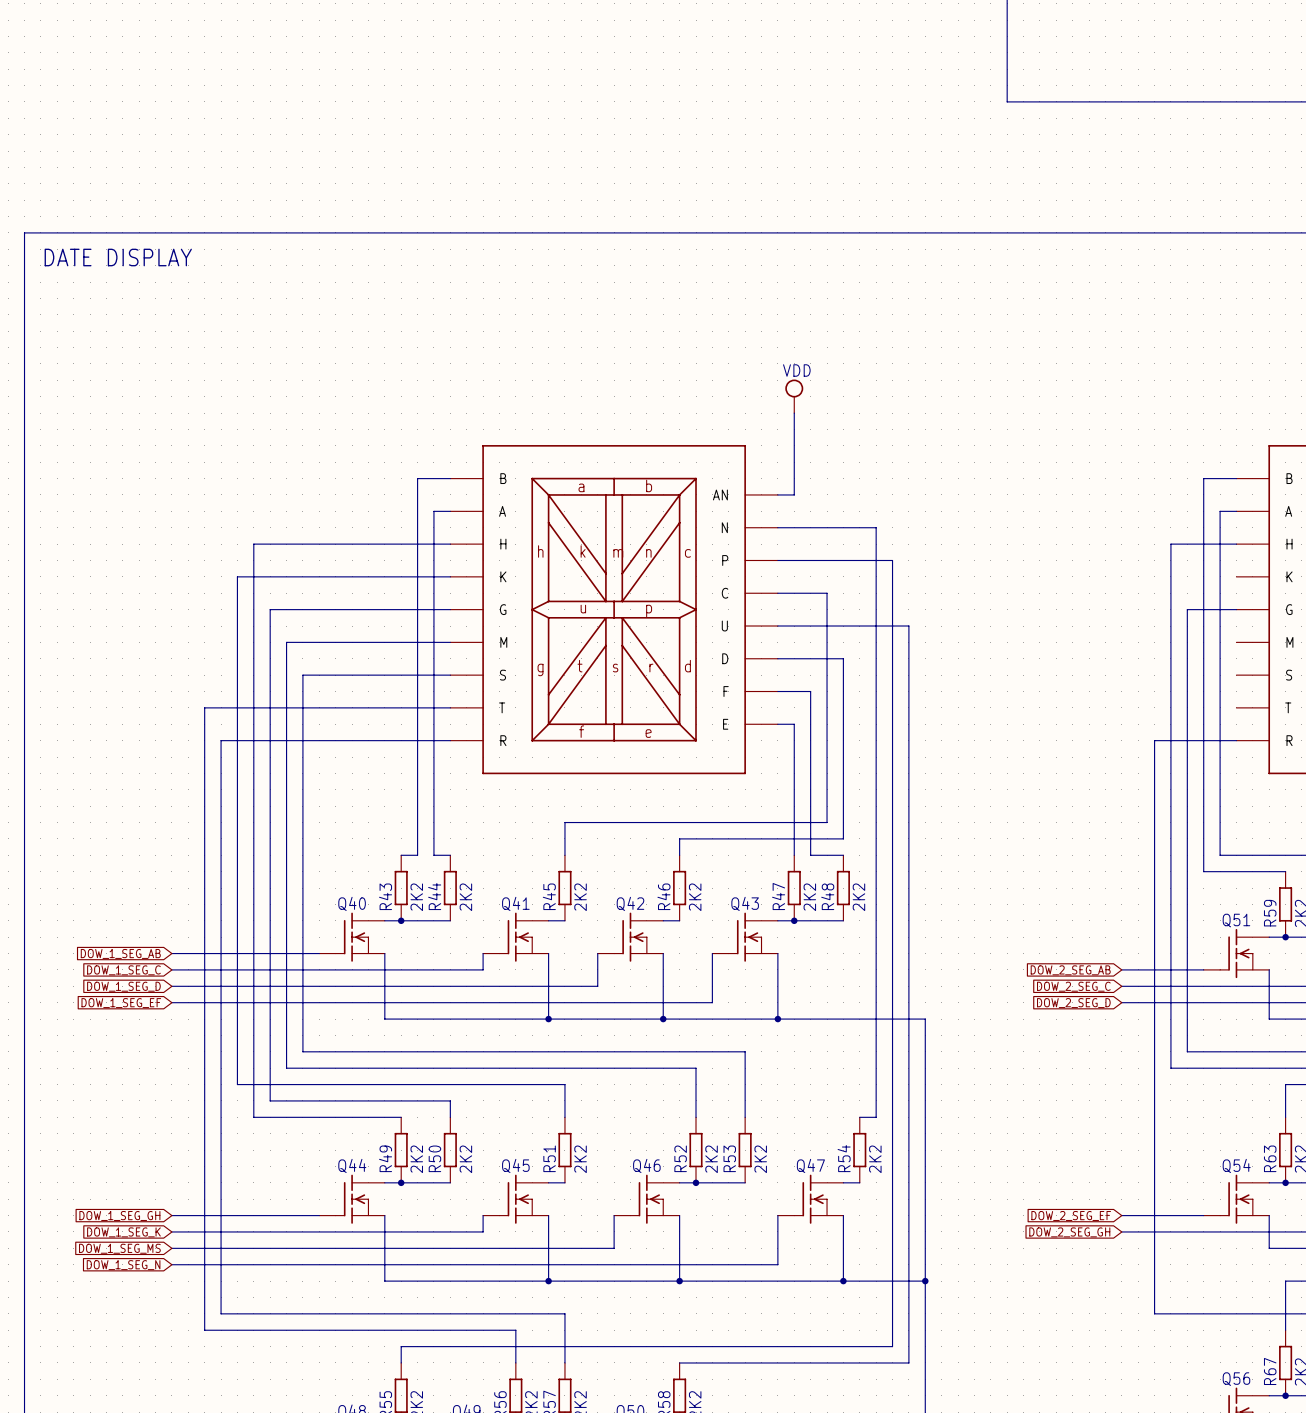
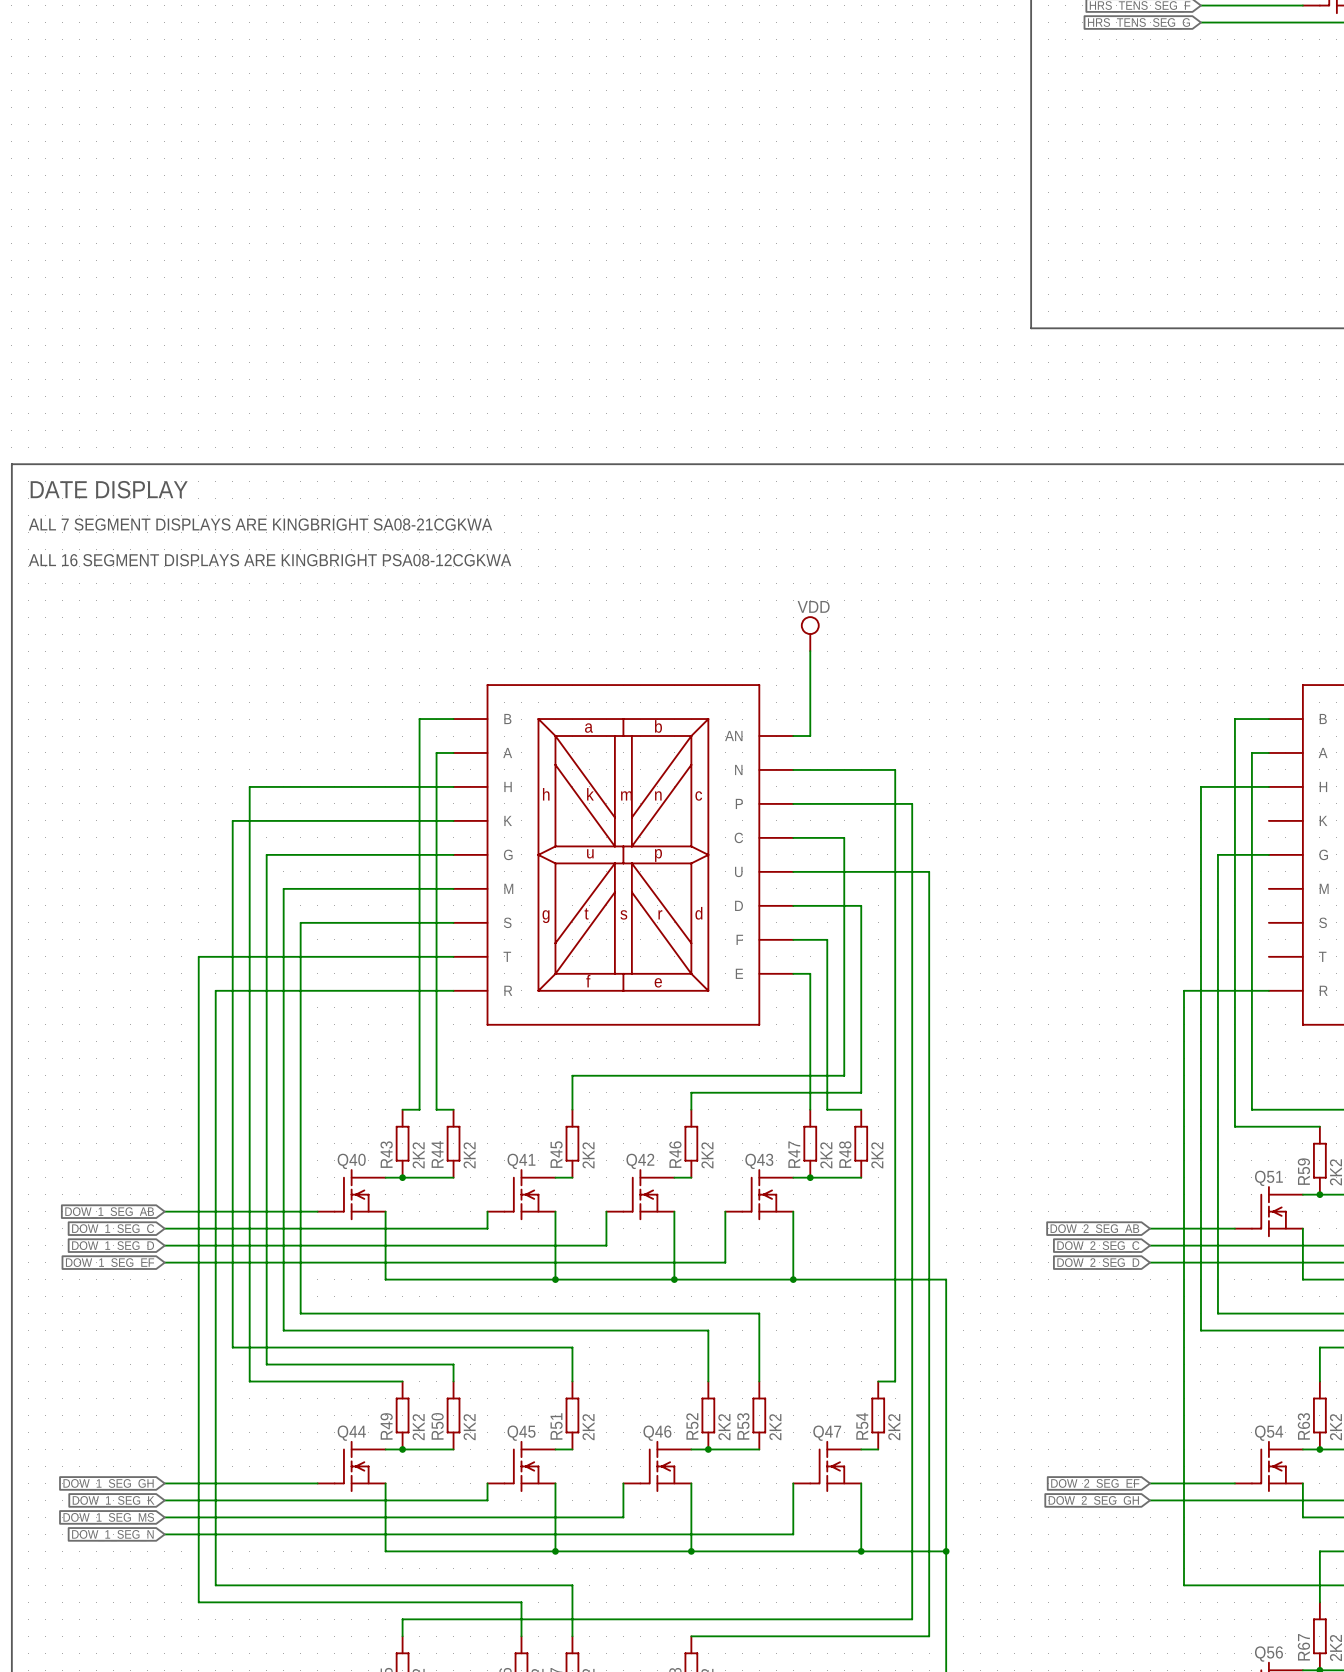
text: none -> ALL 7 SEGMENT DISPLAYS ARE KINGBRIGHT SA08-21CGKWA (260, 524)
text: none -> ALL 16 SEGMENT DISPLAYS ARE KINGBRIGHT PSA08-12CGKWA (270, 560)

